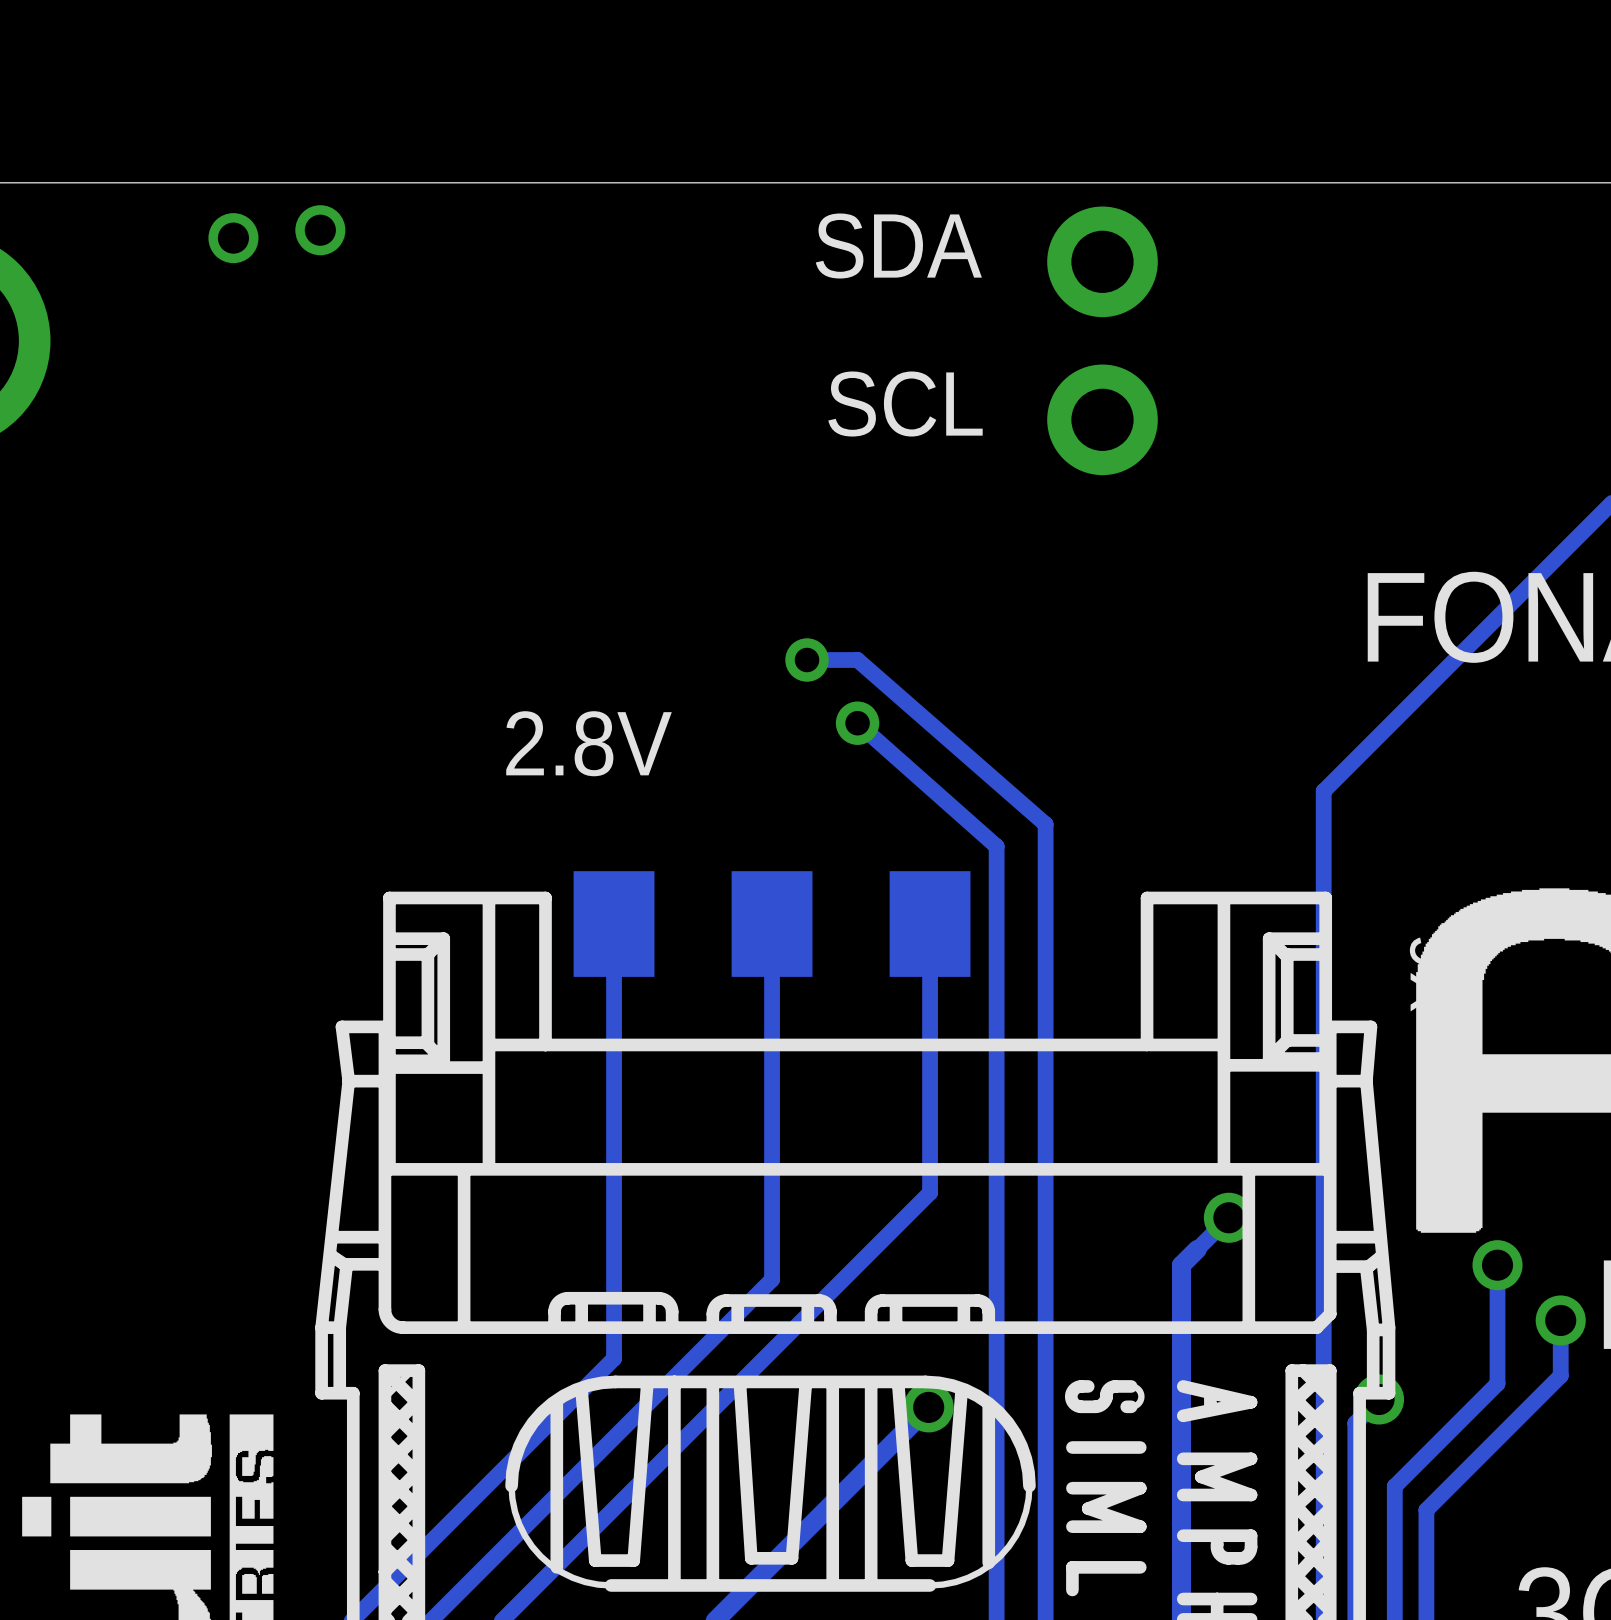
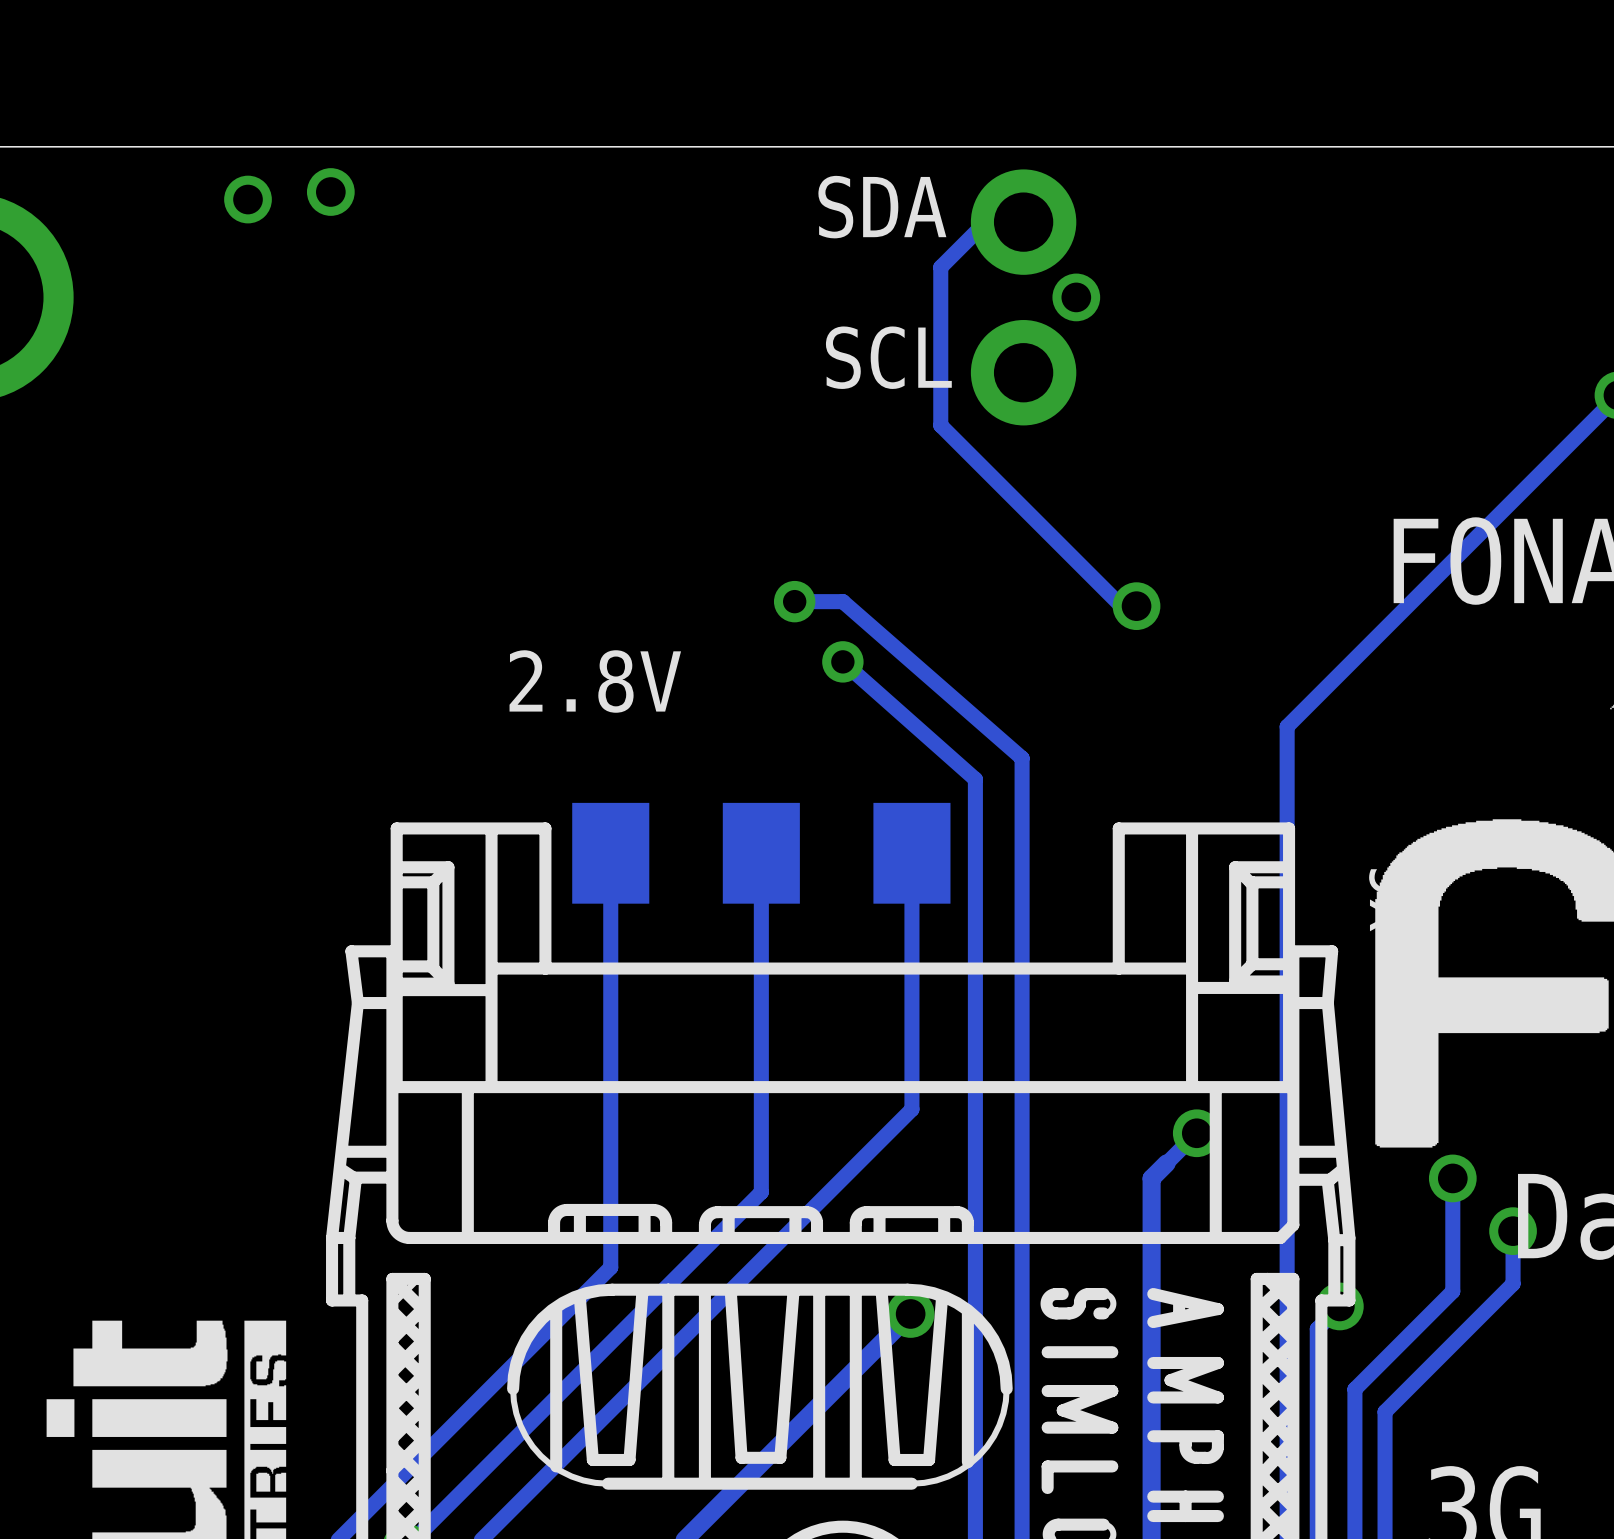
track: none -> (1023, 222) (985, 222) (940, 267) (940, 425) (1121, 606) (1136, 606)
part position: (1102, 340) -> (1023, 297)
via: none -> (1076, 297)
via: none -> (1136, 606)

